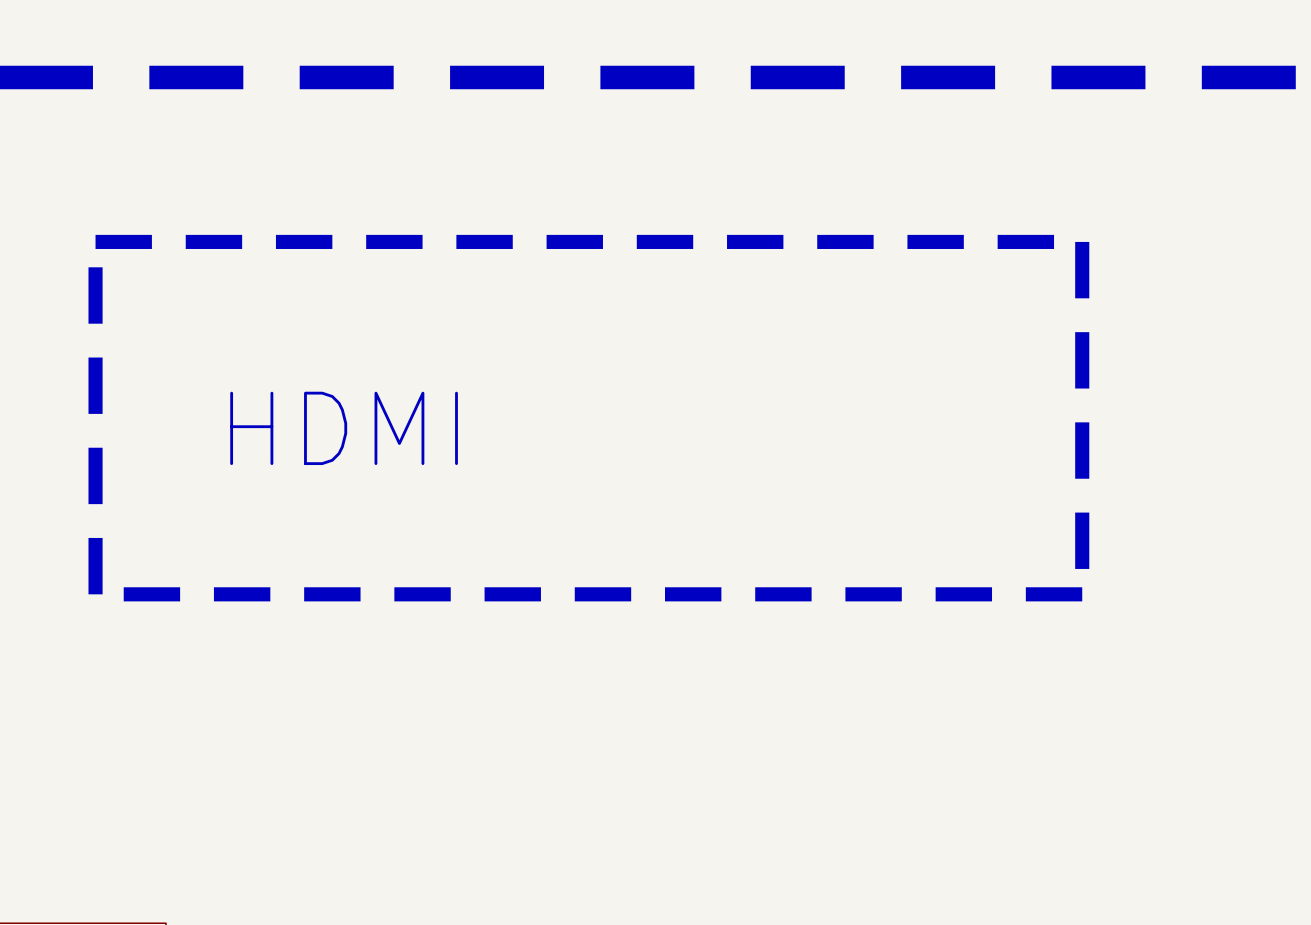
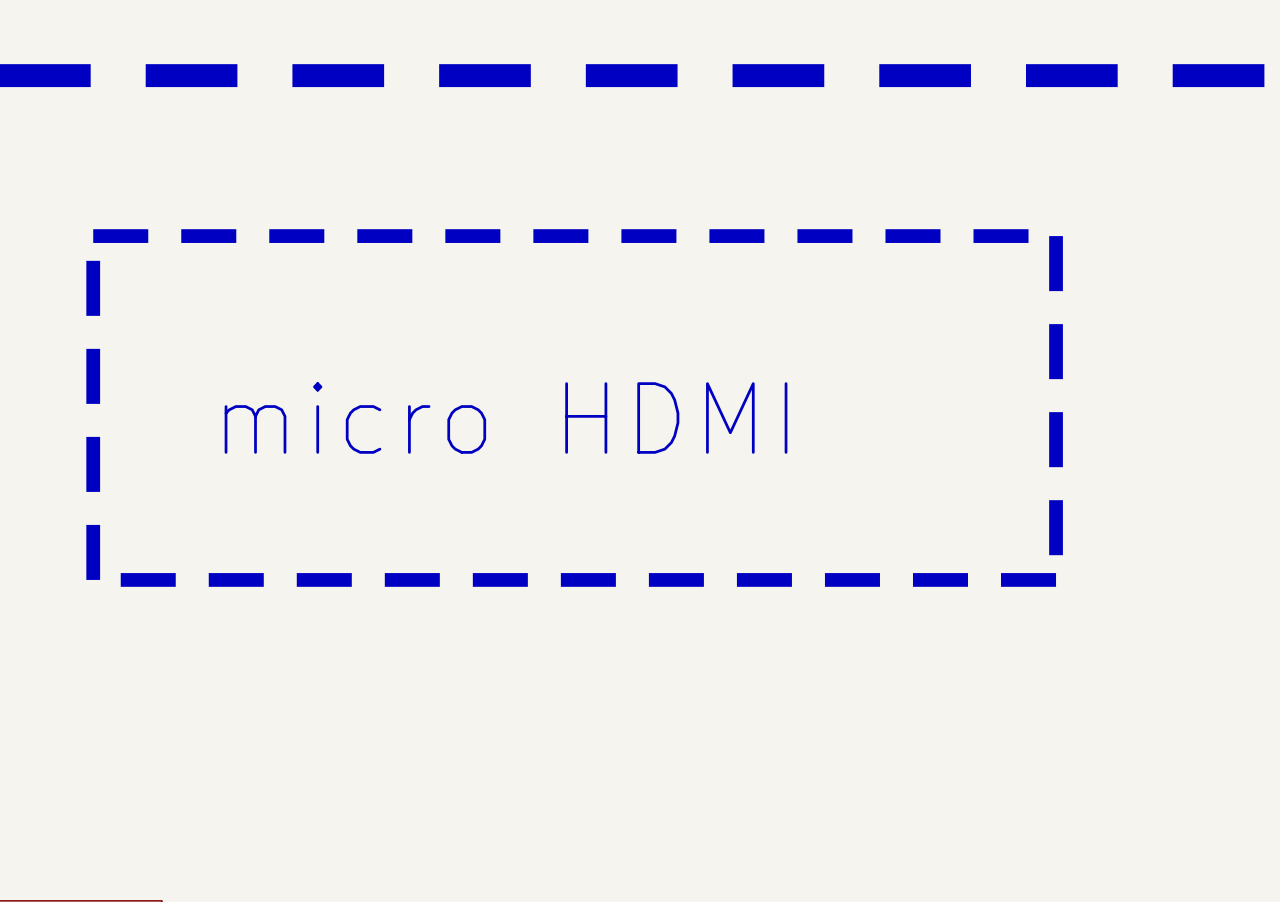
text: HDMI (344, 428) -> micro HDMI (506, 418)

